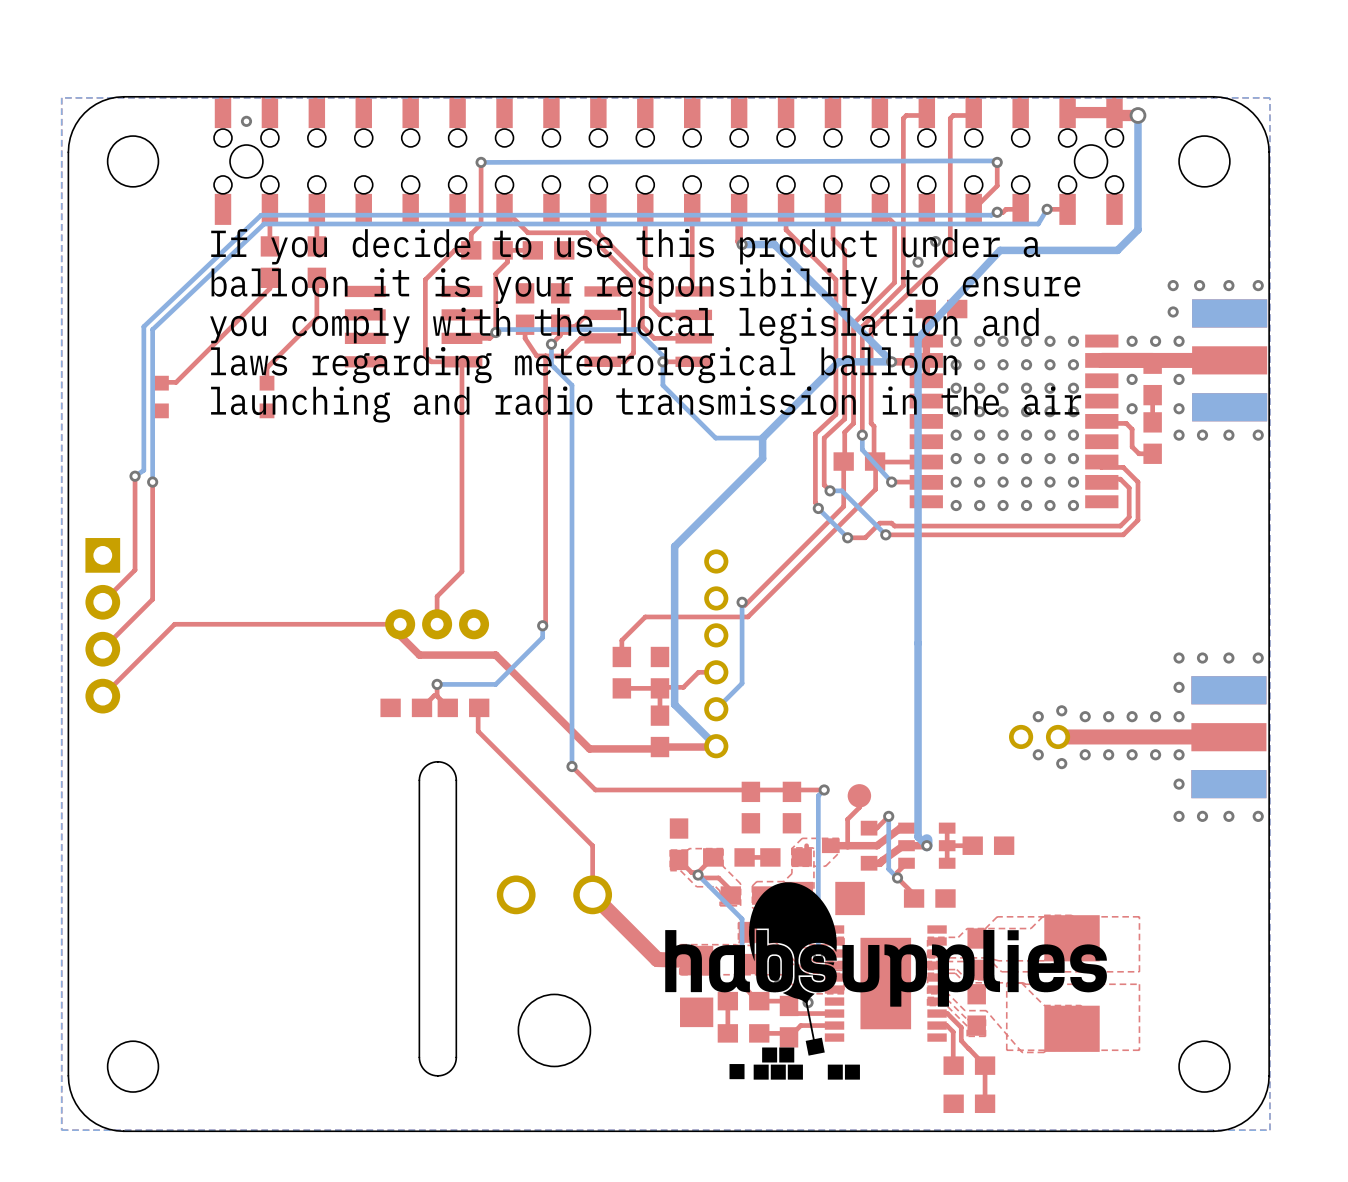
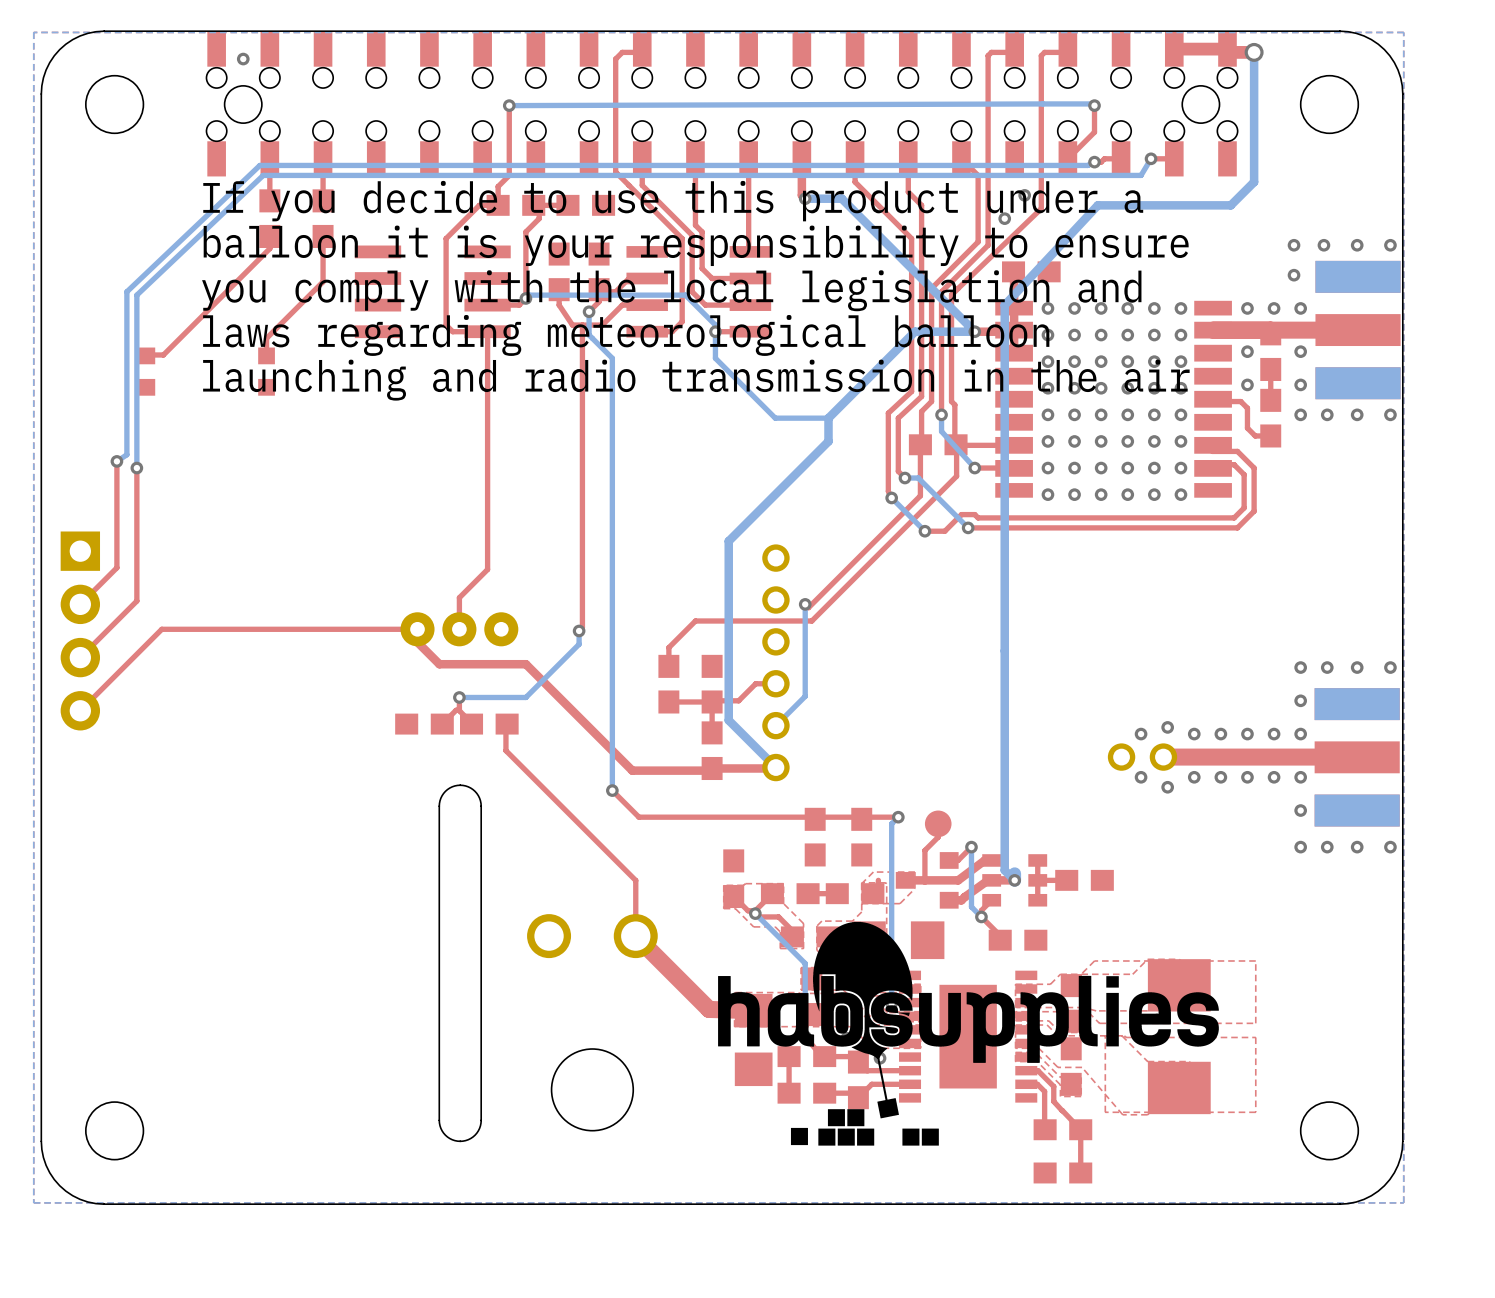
top track: (504, 200) (504, 209) (527, 232) (586, 232) -> (642, 49) (642, 52) (622, 52) (615, 59) (615, 172) (628, 185)

